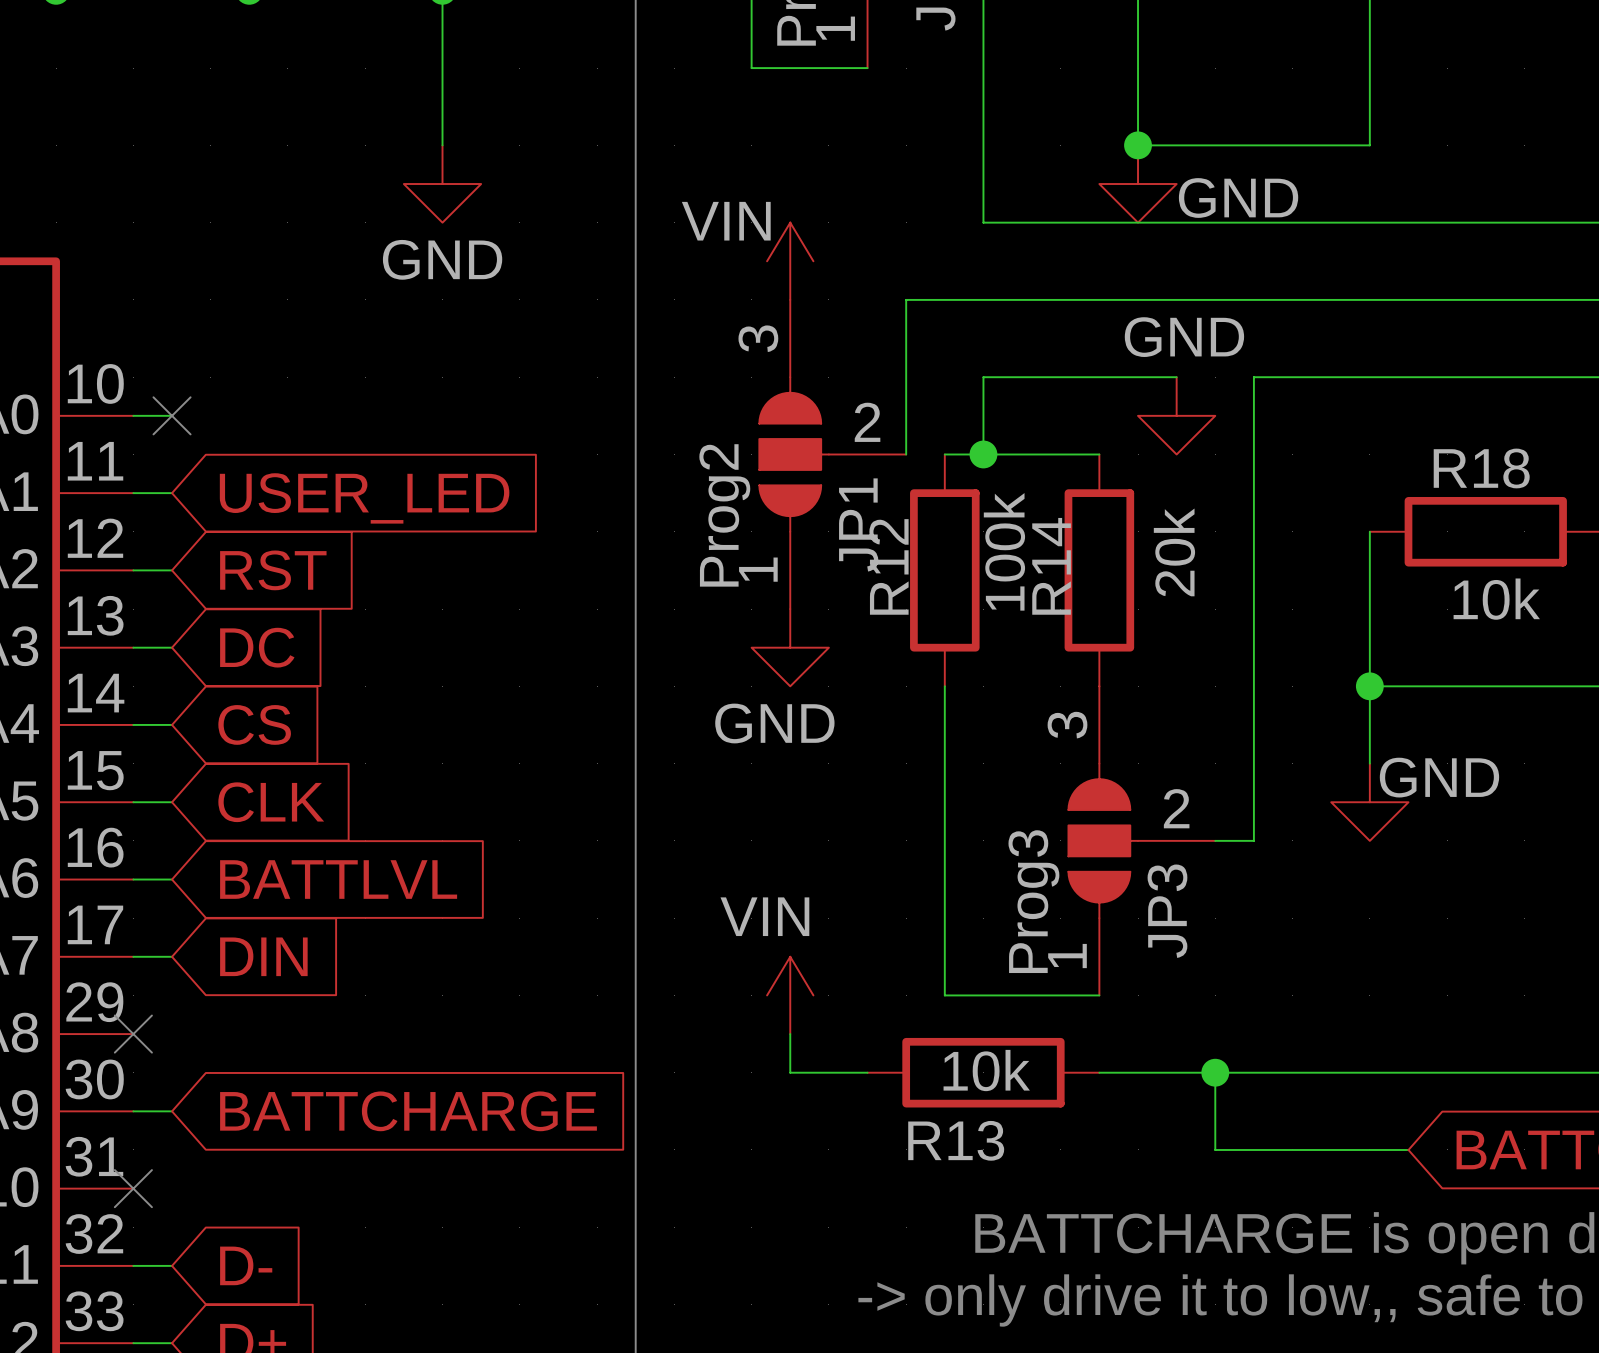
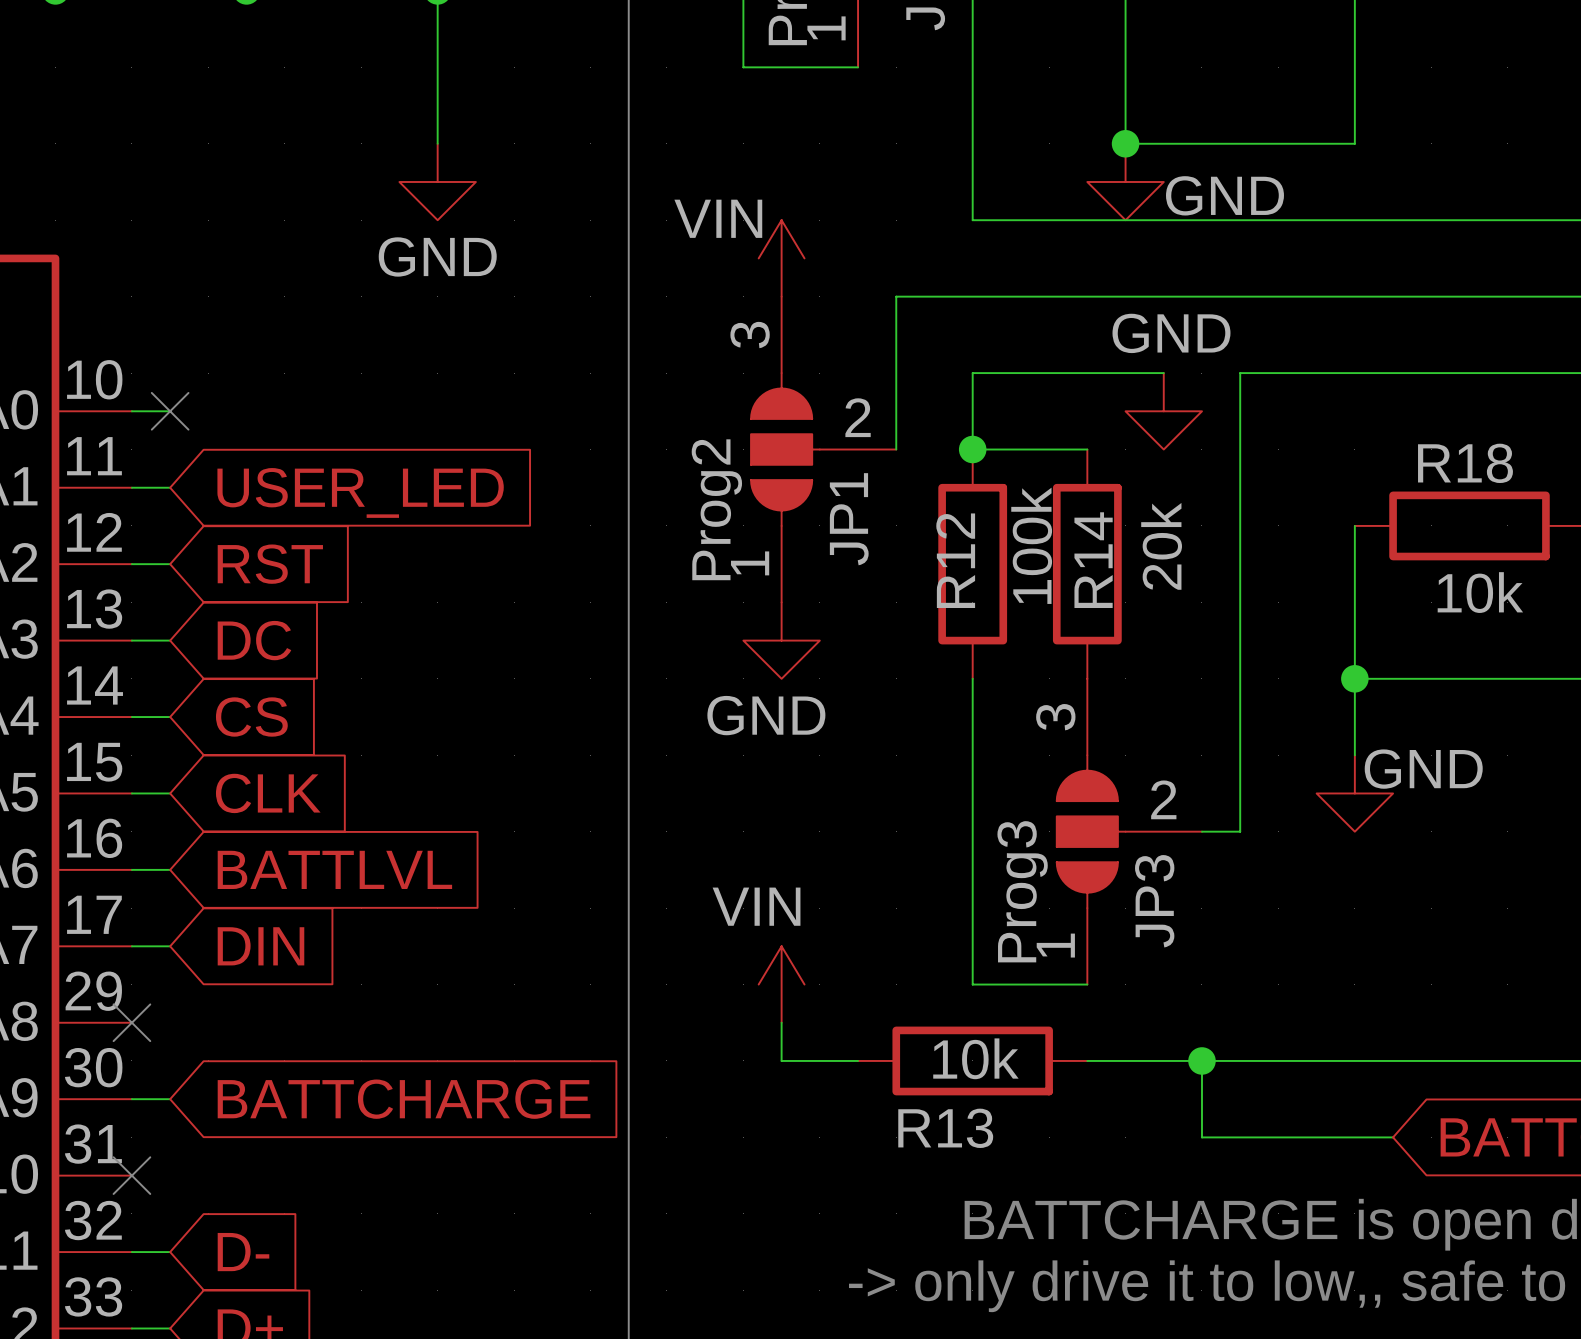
wire: (944, 454) (983, 454) -> none
R12 name position: R12 (888, 566) -> R12 (955, 560)
R14 name position: R14 (1051, 566) -> R14 (1093, 560)
R12 position: (944, 570) -> (972, 564)
wire: (944, 686) (944, 995) (983, 995) -> (972, 678) (972, 984)

